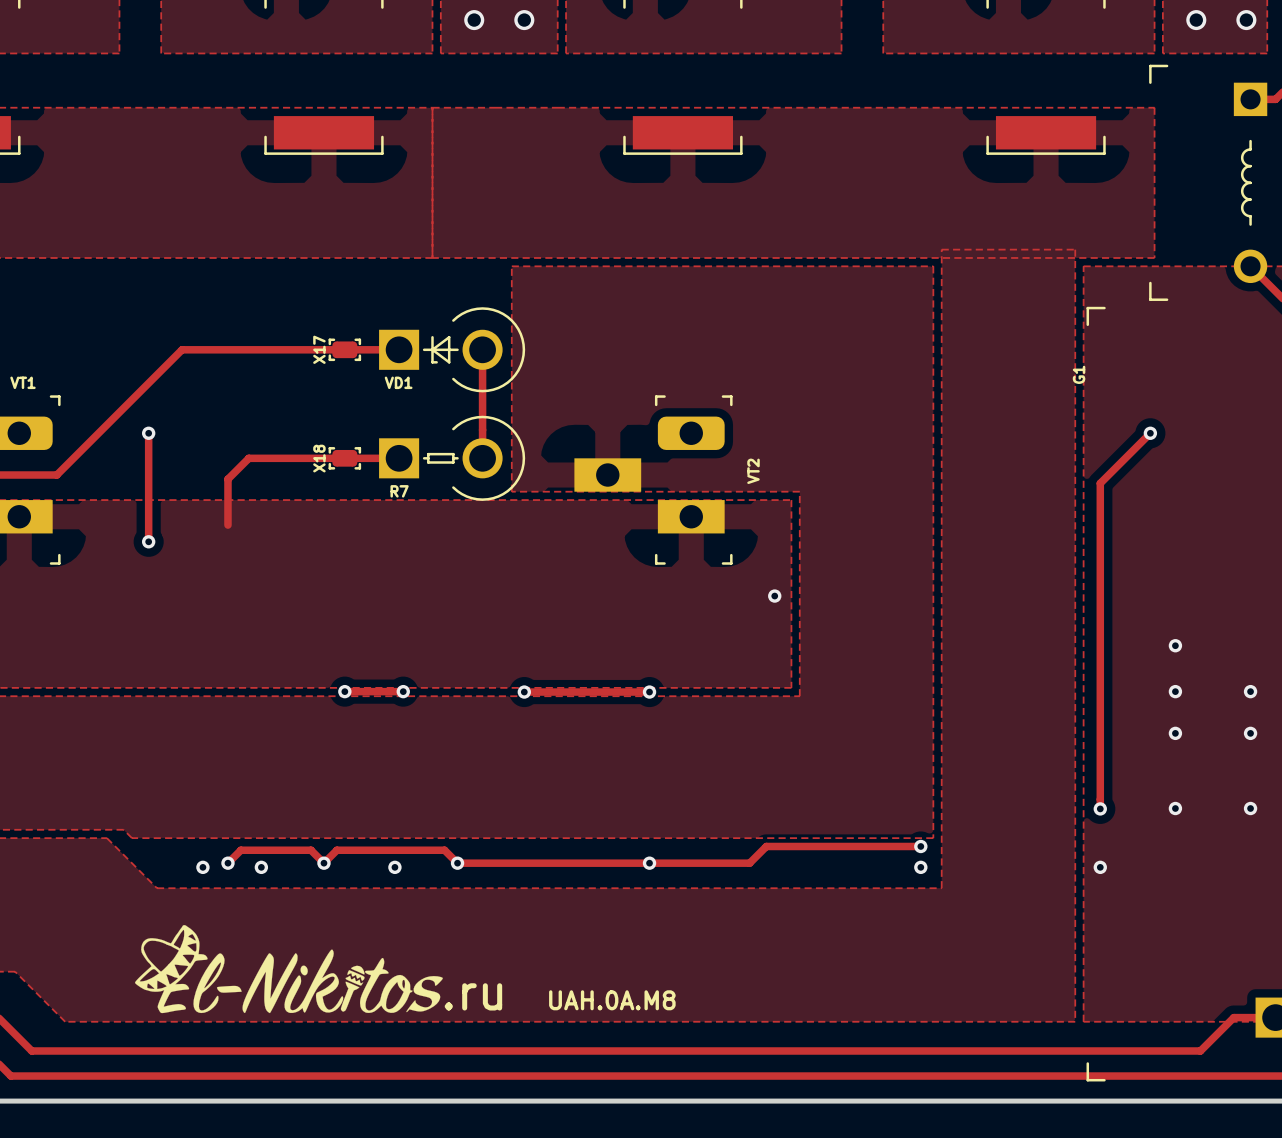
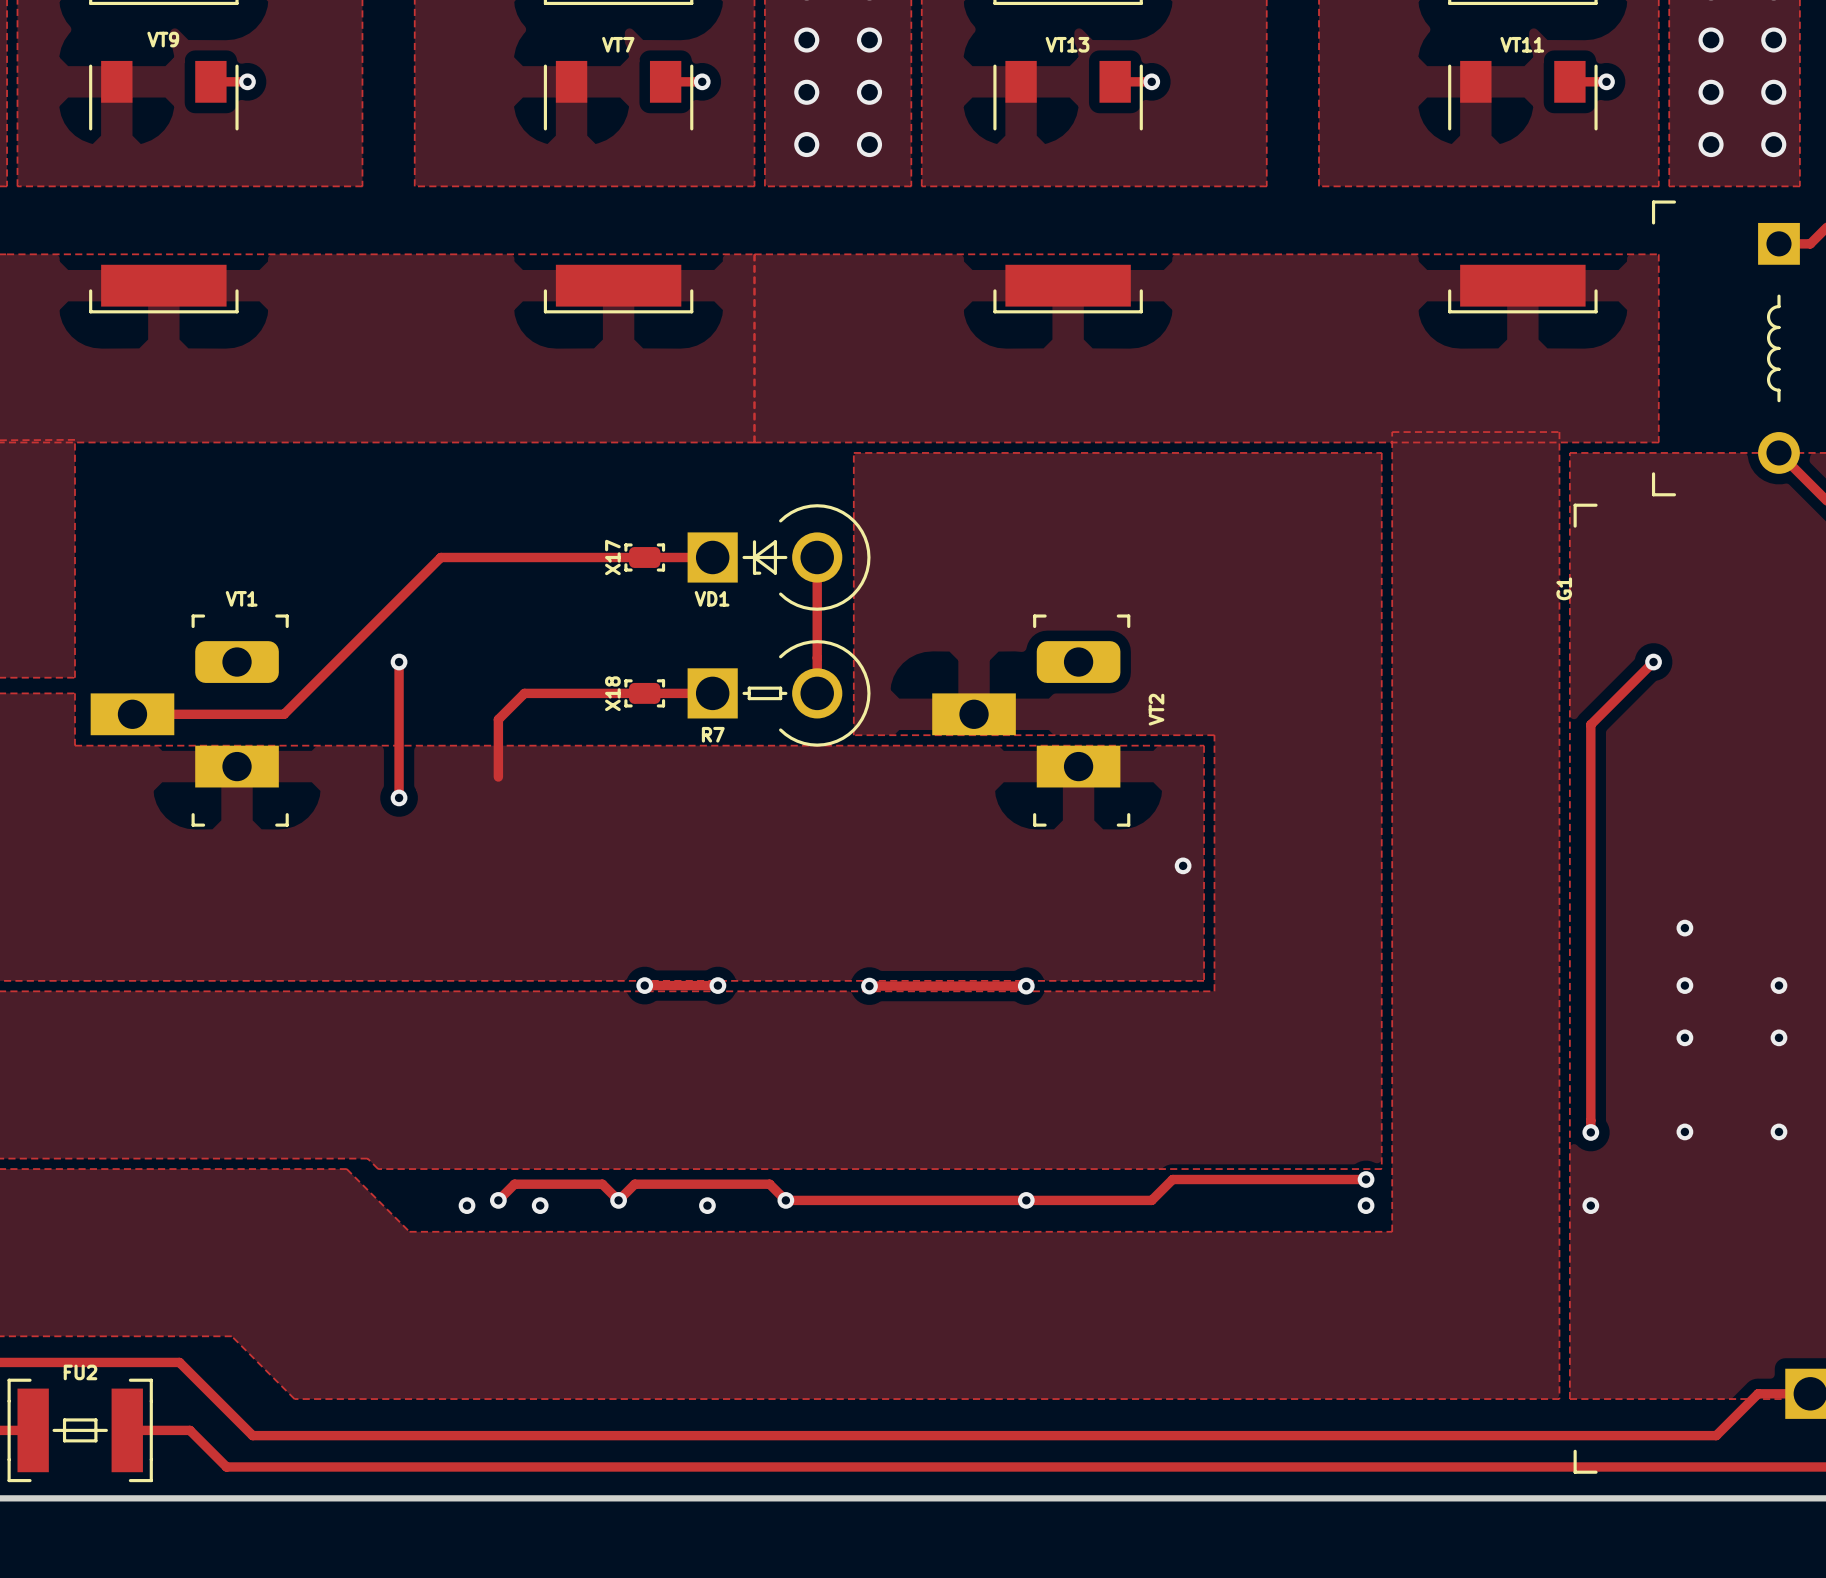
drawing: [134, 925, 443, 1014] -> none
text: .ru (473, 996) -> none
text: UAH.0A.M8 (612, 1000) -> none

